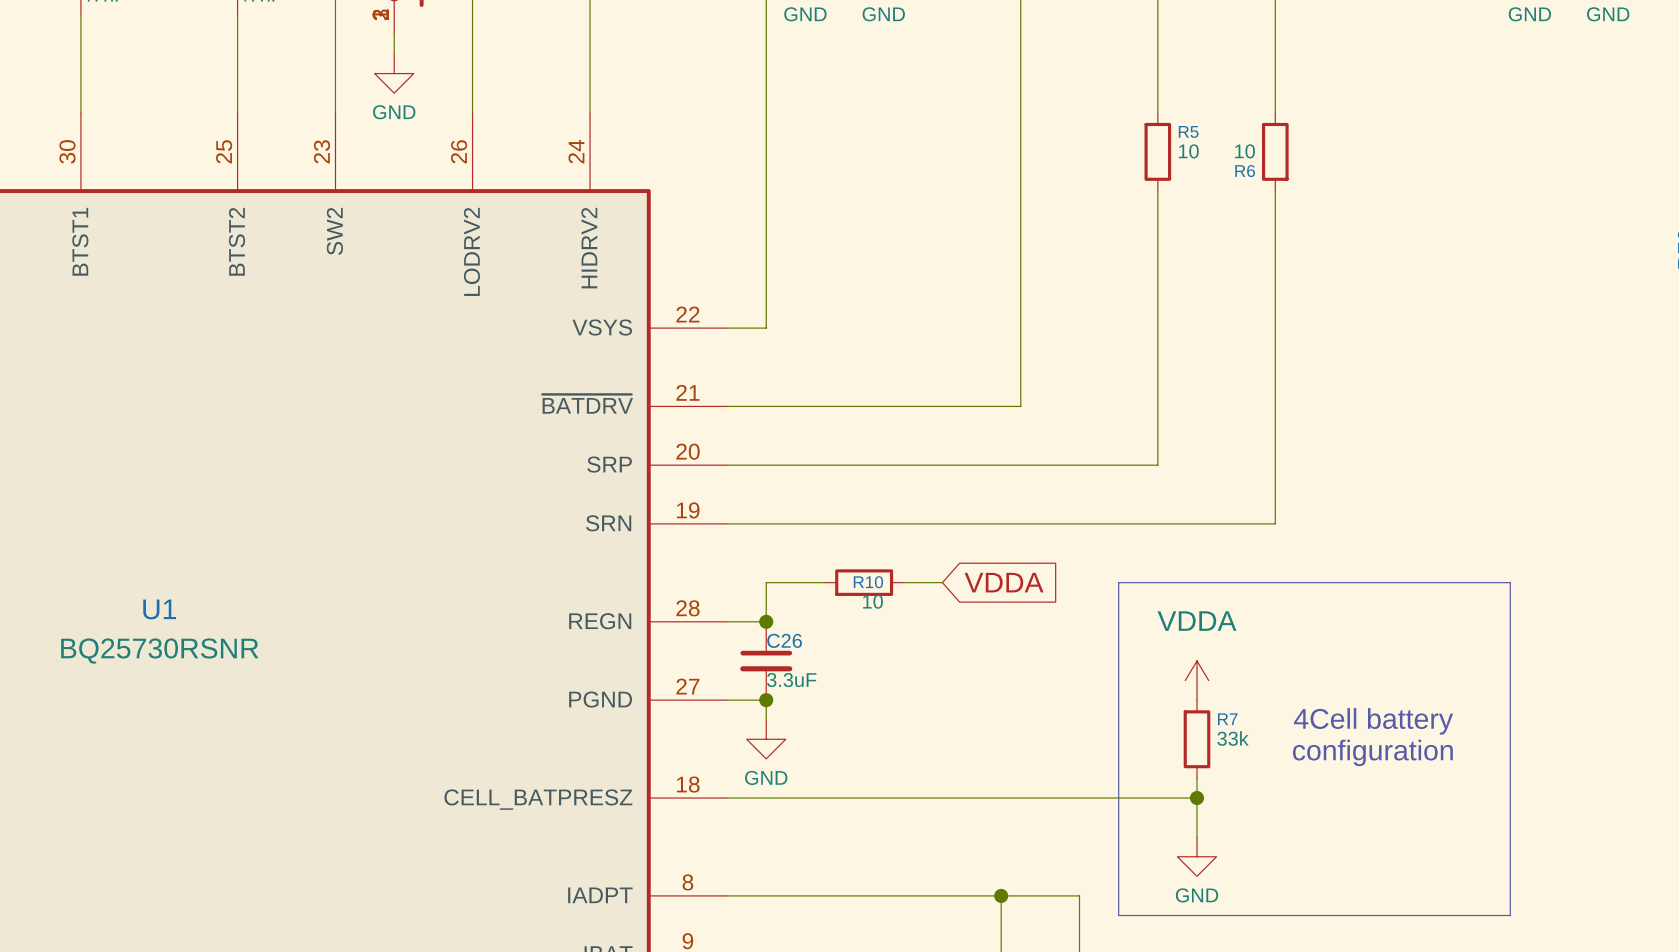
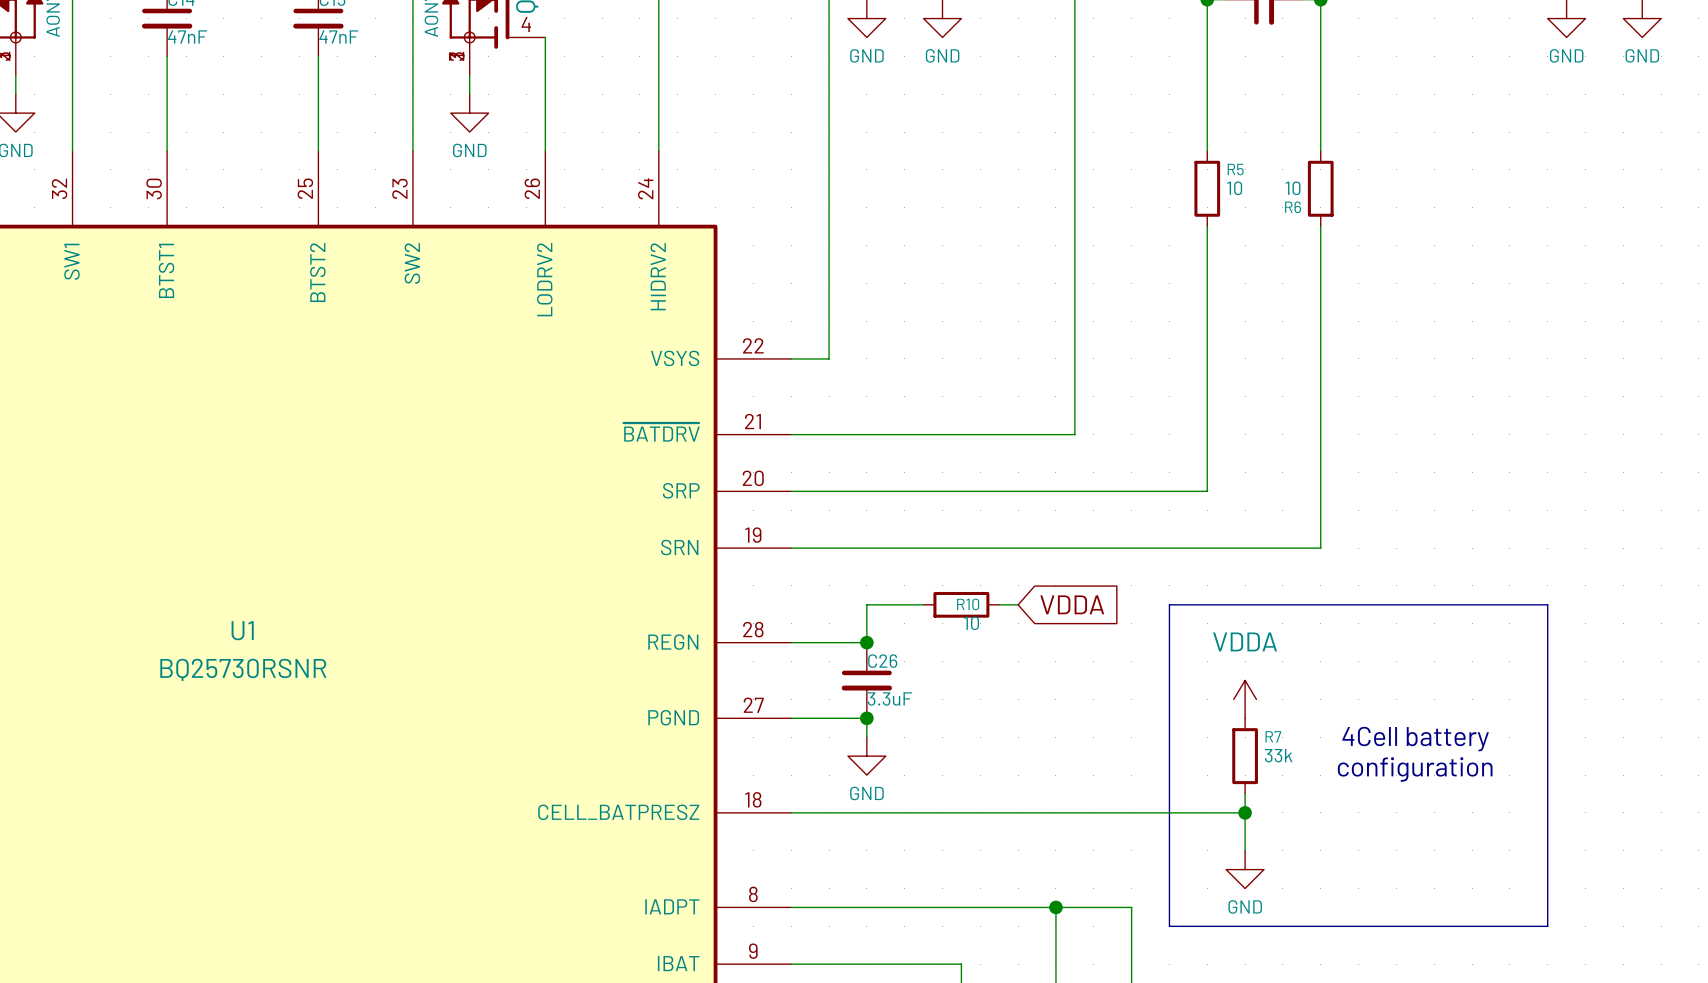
wire: (805, 582) (766, 582) (766, 621) -> (866, 604) (866, 642) (829, 642)
wire: none -> (885, 604) (923, 604)
R10 position: (864, 582) -> (961, 604)
wire: (903, 582) (942, 582) -> (1018, 604) (999, 604)
global label position: VDDA (1004, 582) -> VDDA (1072, 604)
junction position: (766, 621) -> (866, 642)
C26 position: (766, 660) -> (866, 680)
wire: (766, 700) (766, 719) -> (829, 718) (866, 718) (866, 737)
junction position: (766, 700) -> (866, 718)
power symbol position: GND (766, 739) -> GND (866, 756)

